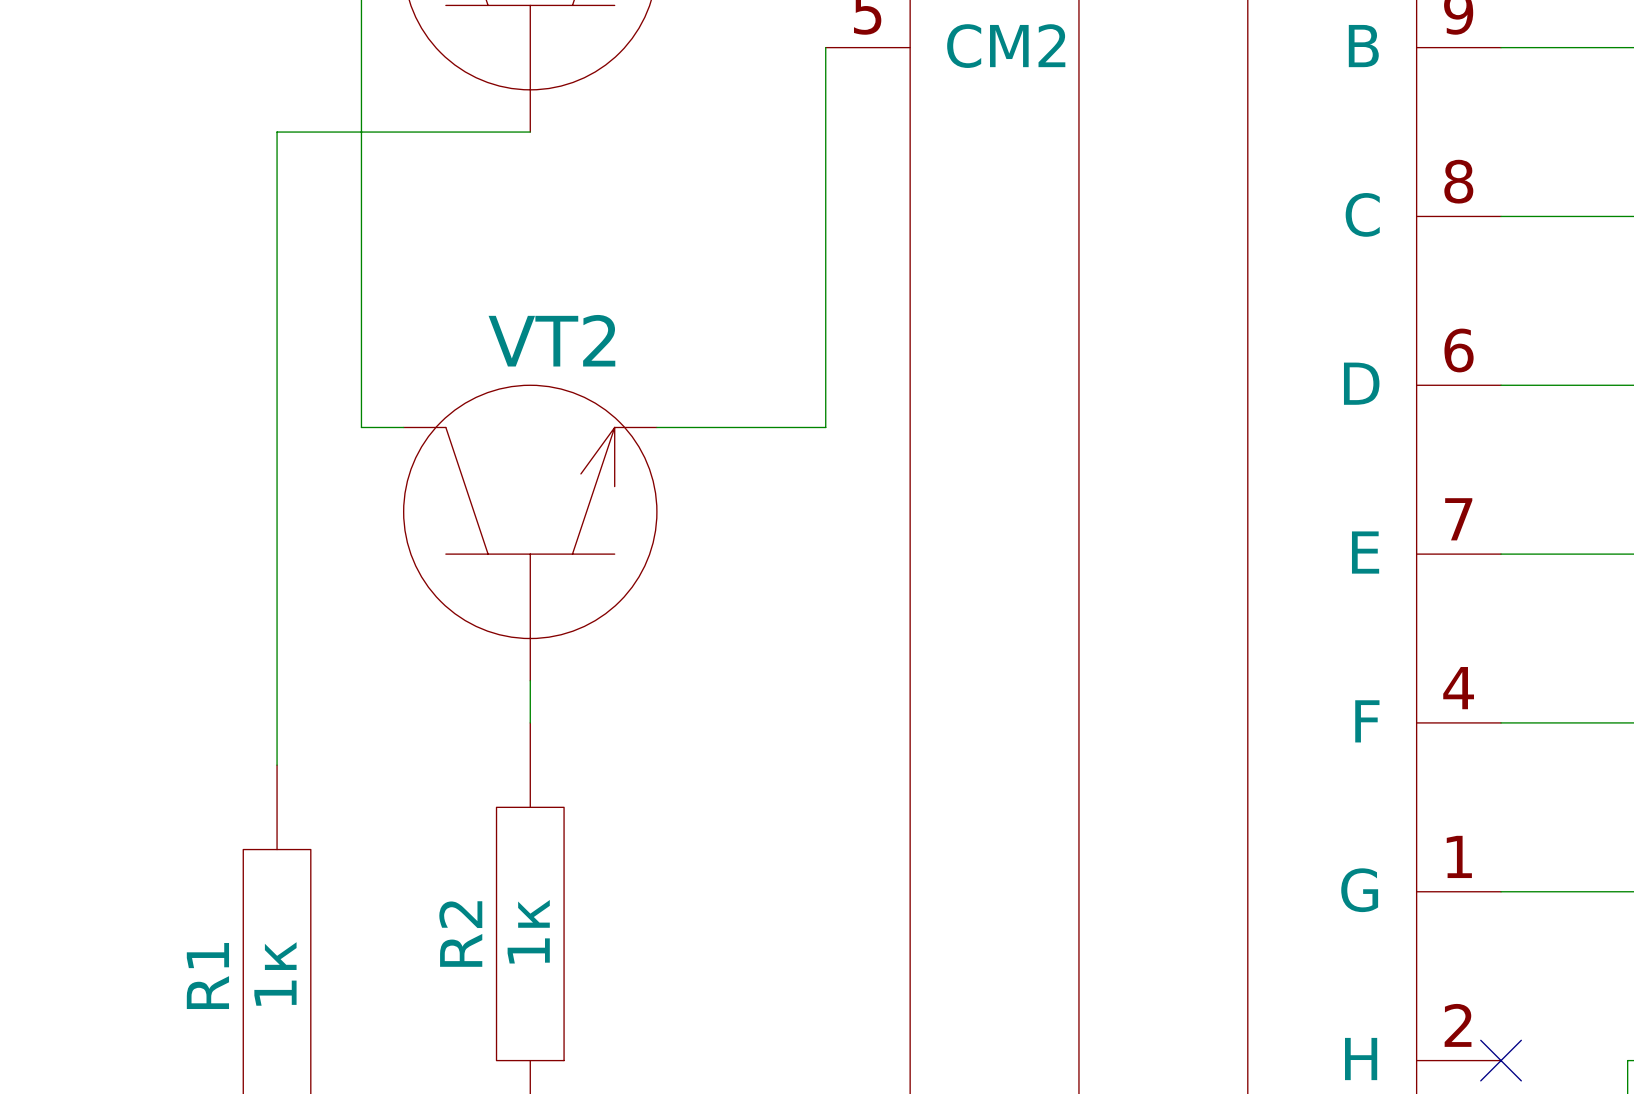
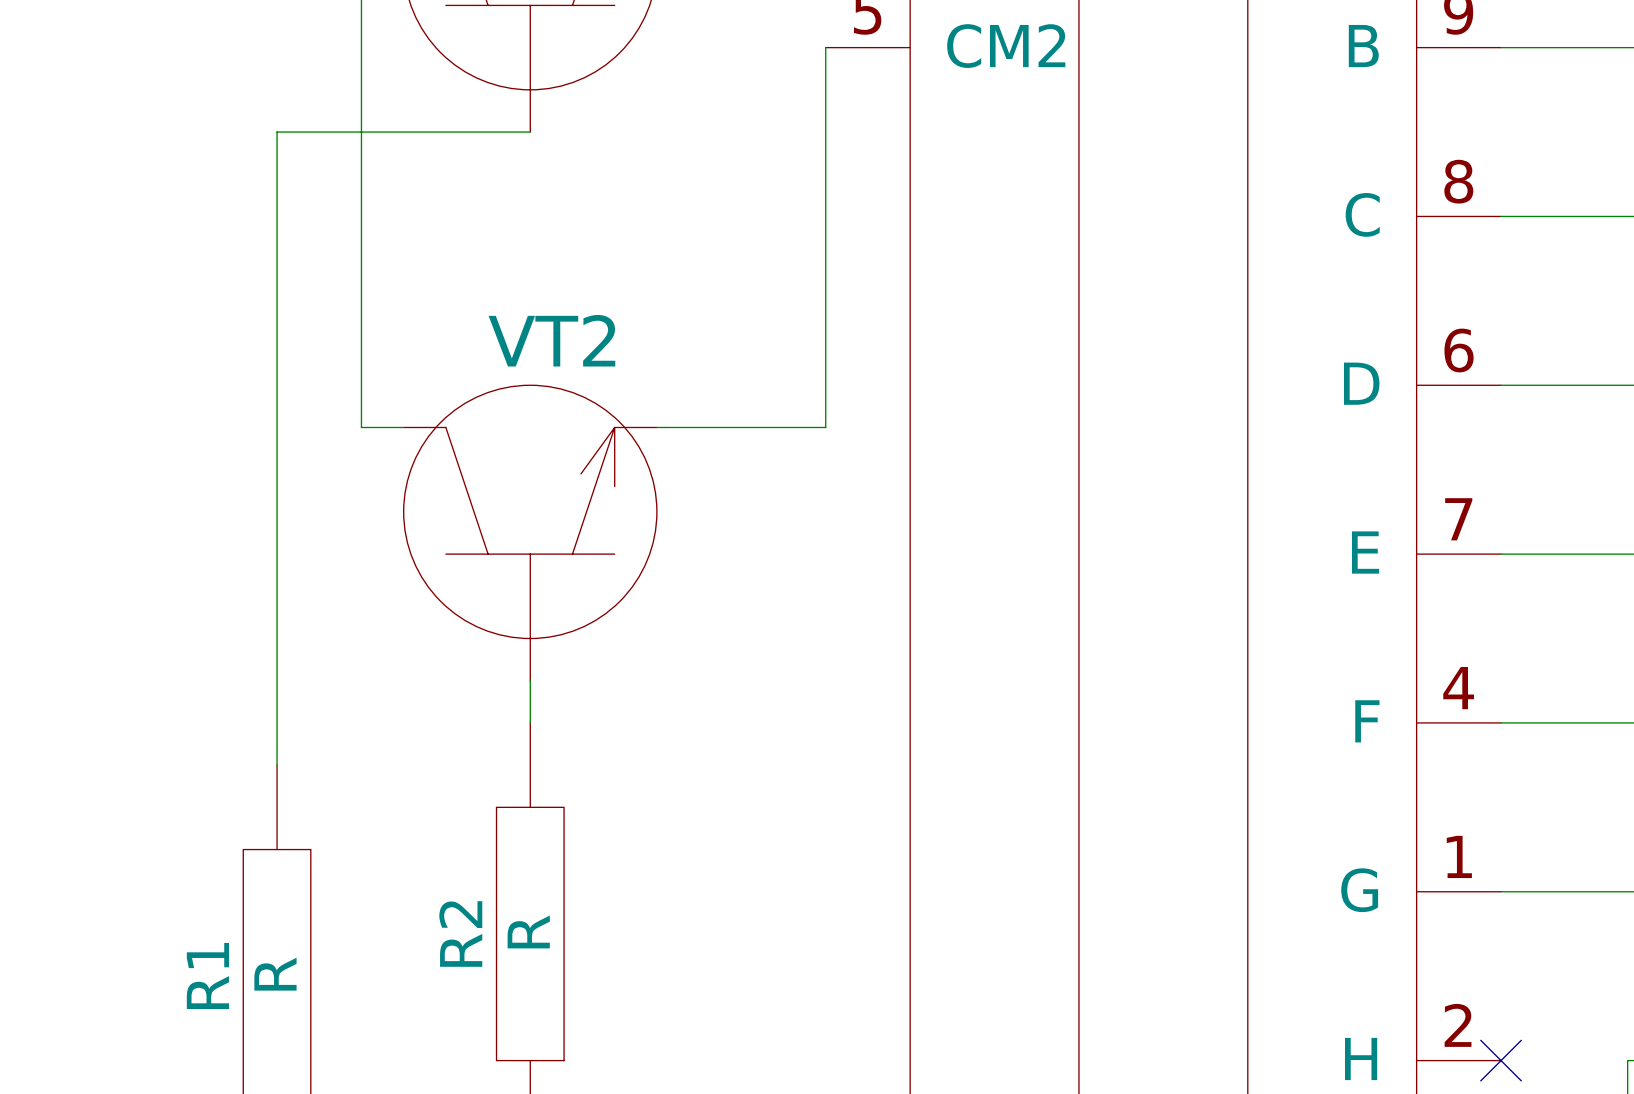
R2 value: 1к (528, 931) -> R (528, 931)
R1 value: 1к (275, 973) -> R (275, 974)

